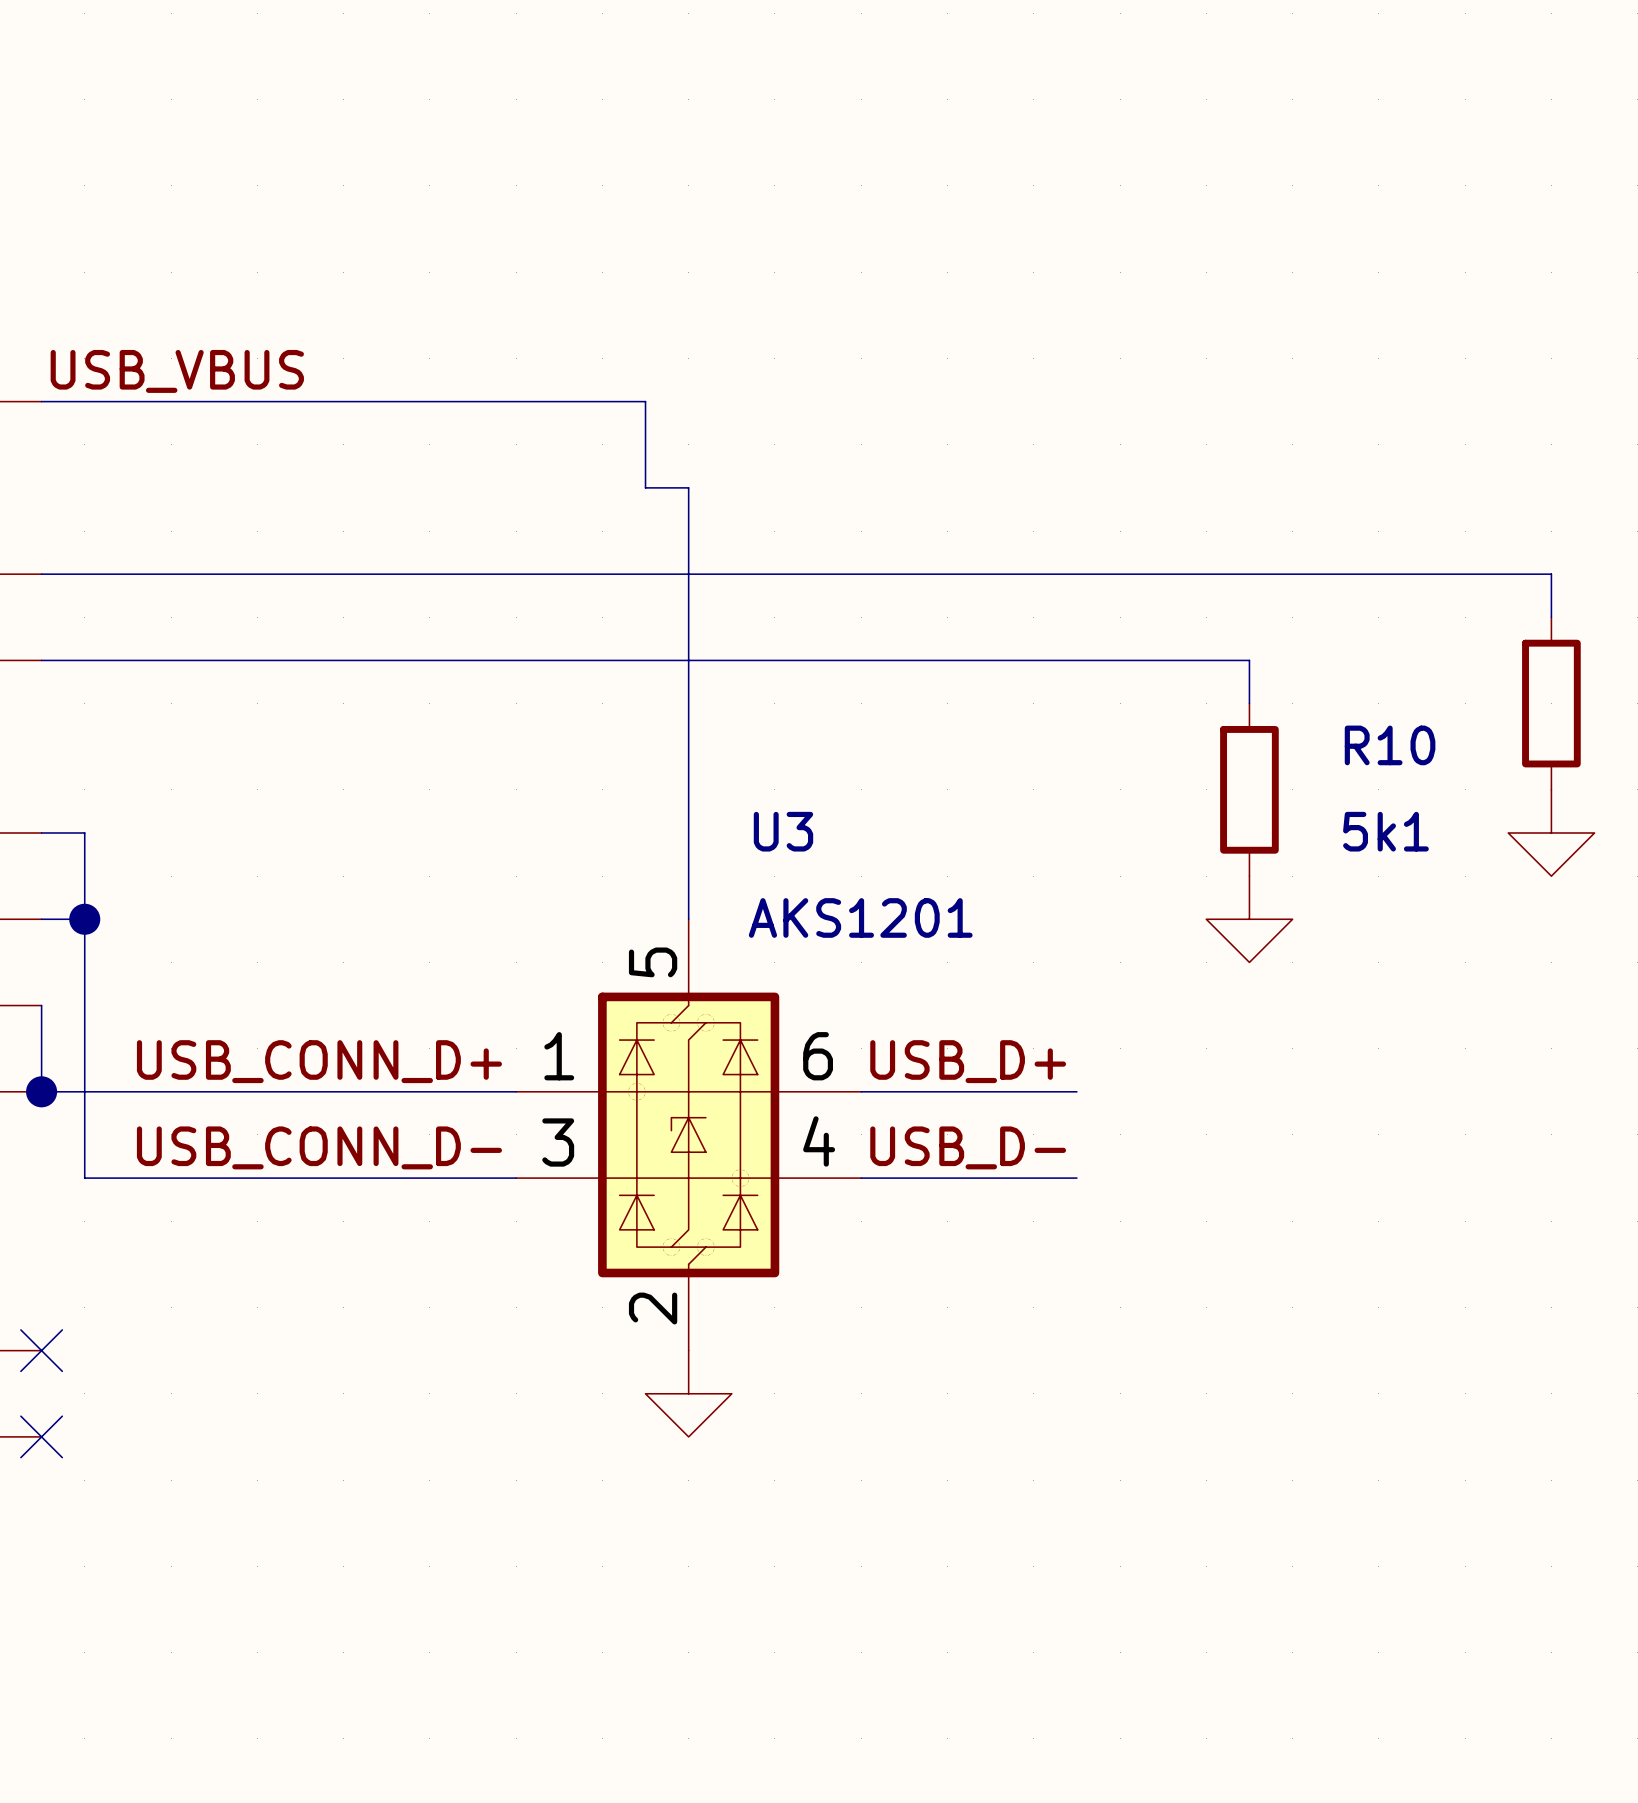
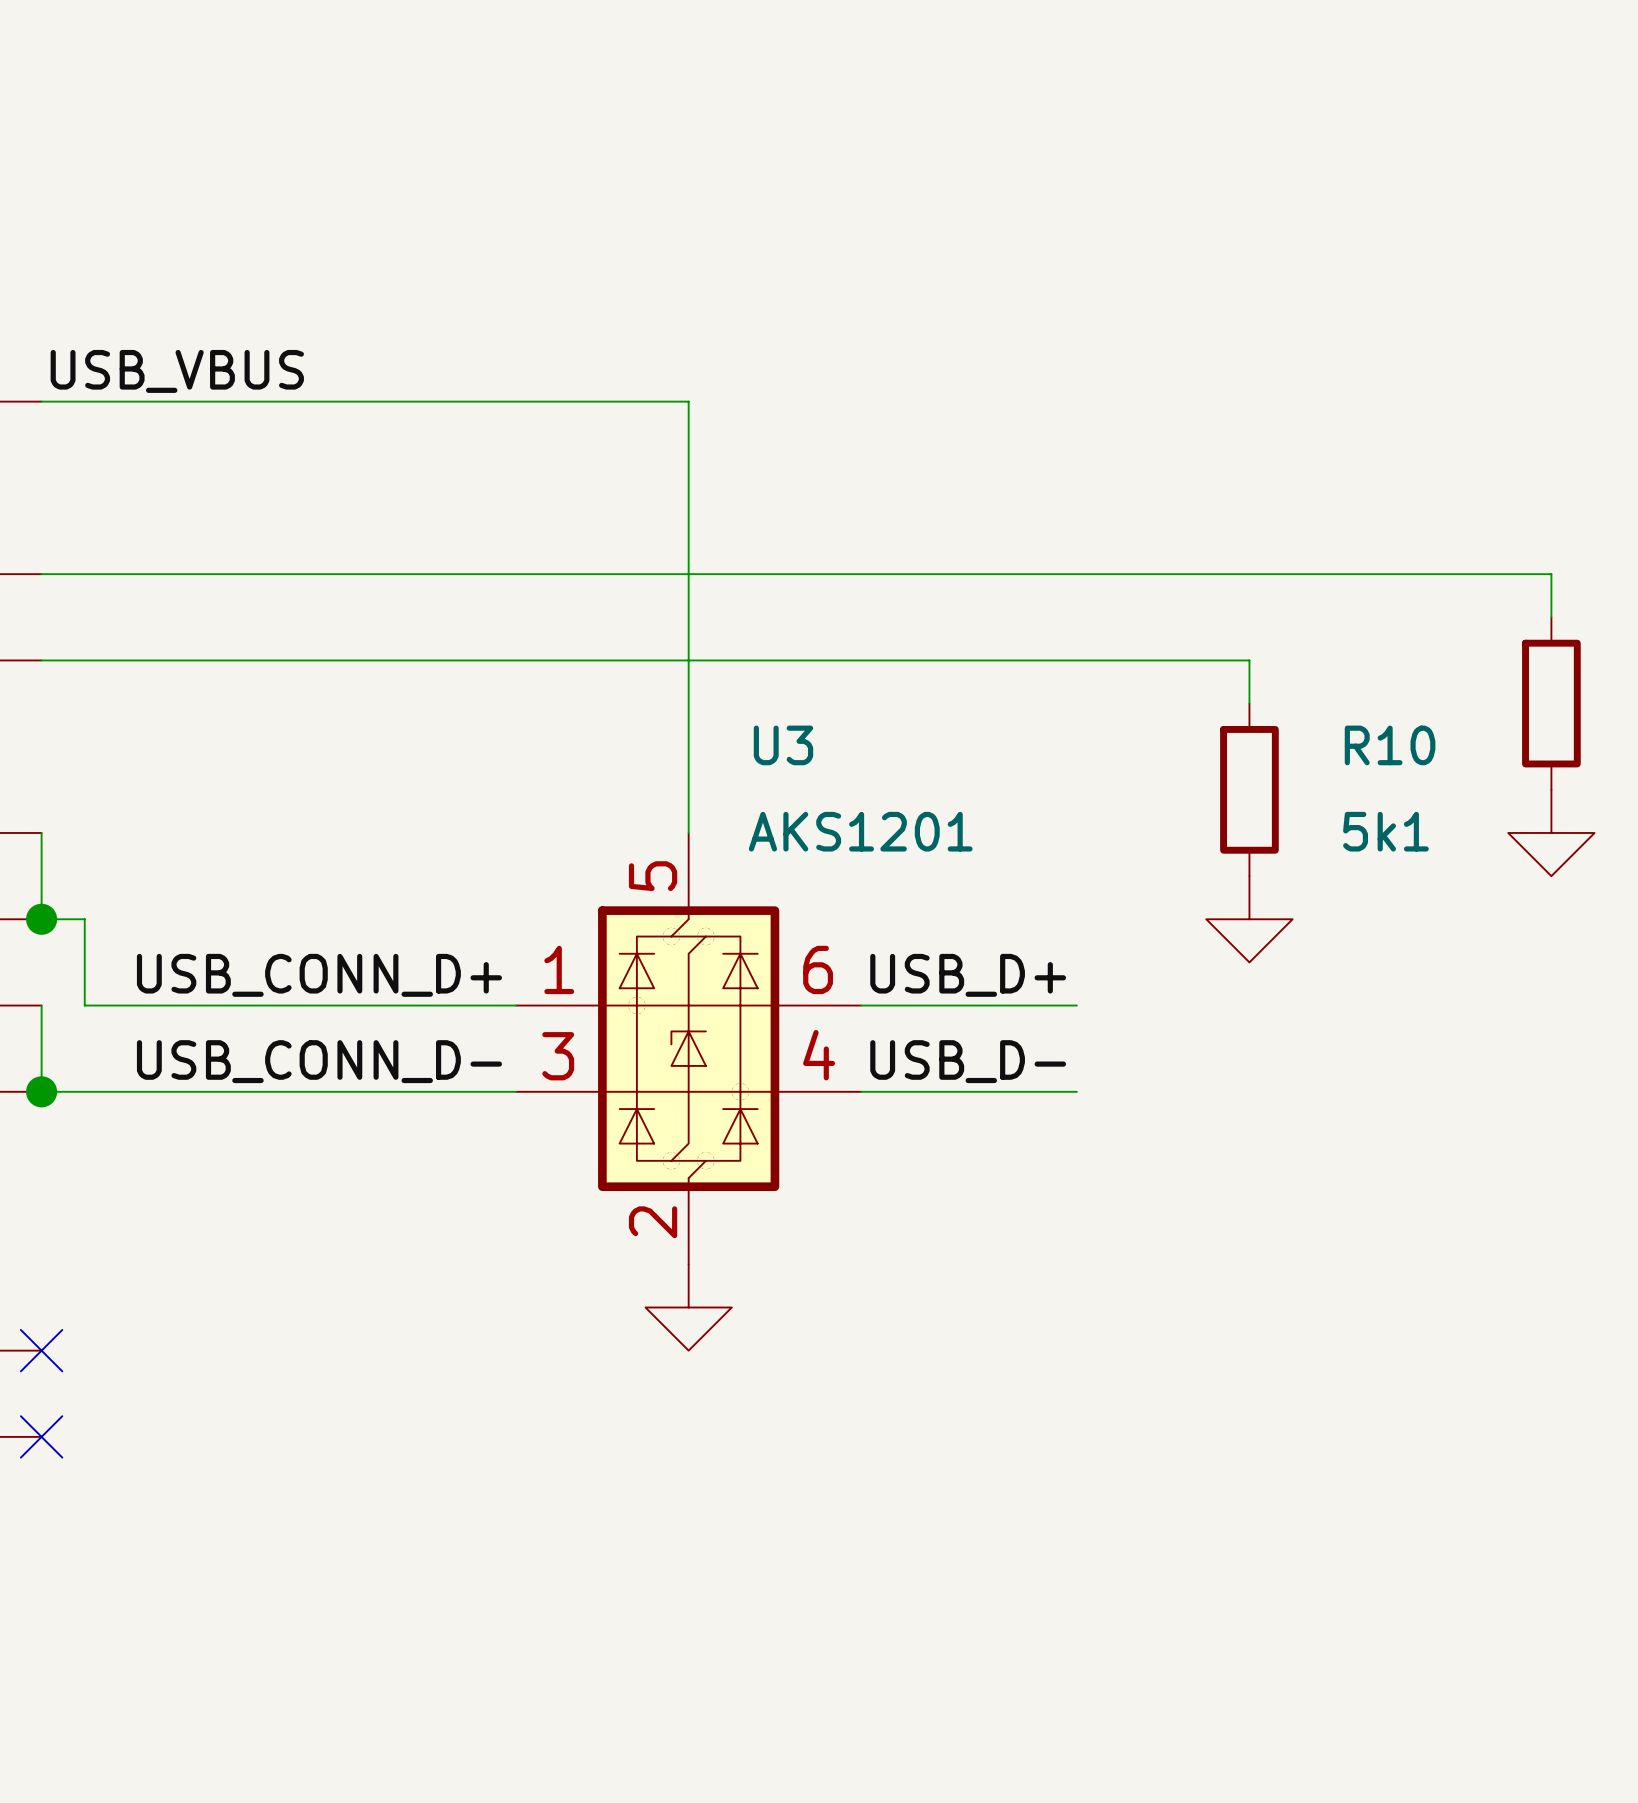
wire: (645, 401) (645, 487) (688, 487) -> (645, 401) (688, 401) (688, 487)
wire: (41, 832) (84, 832) (84, 919) -> (41, 832) (41, 919)
junction position: (84, 919) -> (41, 919)
label: none -> USB_CONN_D+ (319, 975)
label: none -> USB_D+ (968, 975)
wire: (84, 1005) (84, 1178) (516, 1178) -> (84, 1005) (516, 1005)
label: USB_CONN_D+ (319, 1061) -> USB_CONN_D- (319, 1061)
label: USB_D+ (968, 1061) -> USB_D- (968, 1061)
U3 position: (688, 1134) -> (688, 1048)
label: USB_CONN_D- (319, 1147) -> none
label: USB_D- (968, 1147) -> none
wire: (861, 1178) (1076, 1178) -> (861, 1005) (1076, 1005)
power symbol position: (688, 1393) -> (688, 1307)

